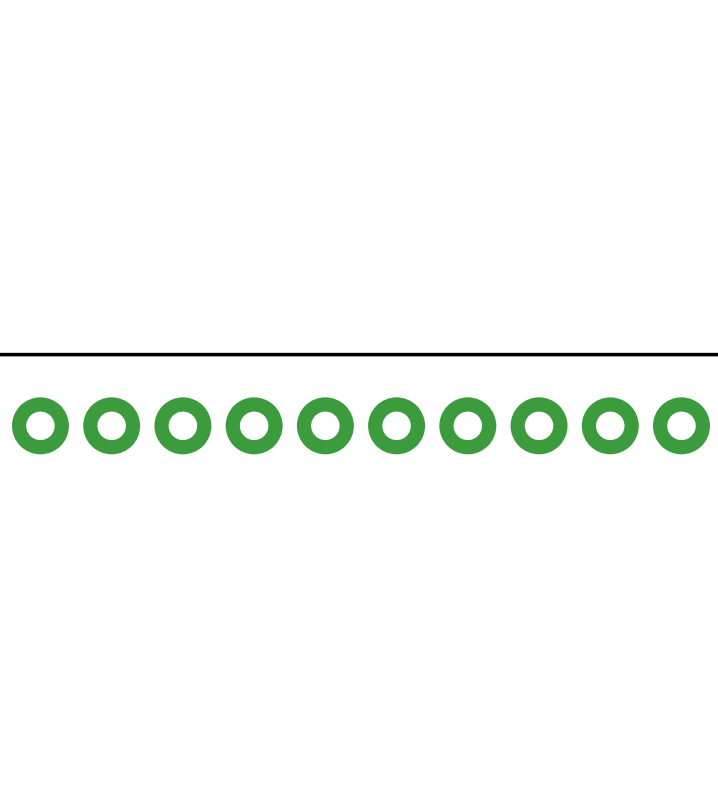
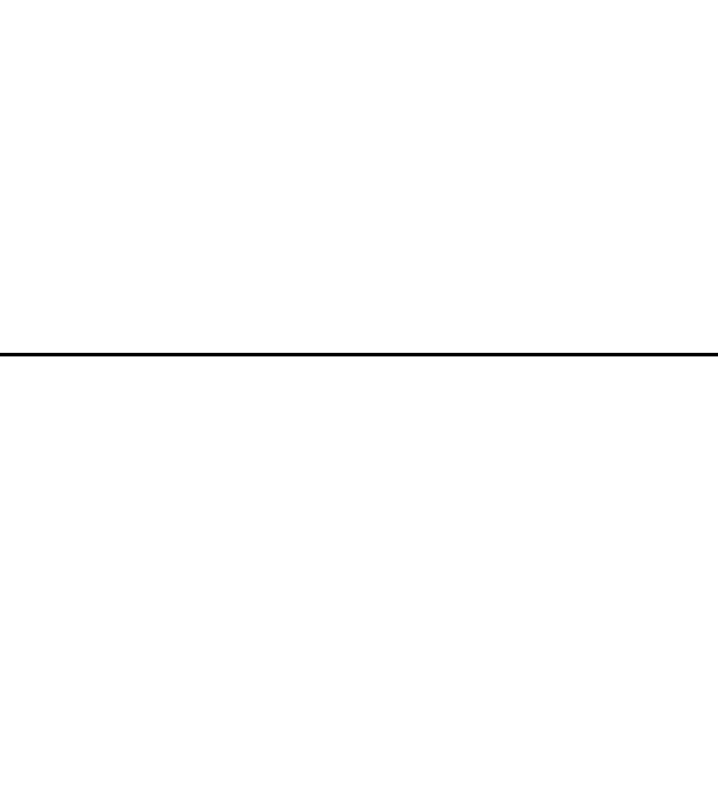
via: (40, 425) -> none
via: (111, 425) -> none
via: (182, 425) -> none
via: (254, 425) -> none
via: (325, 425) -> none
via: (396, 425) -> none
via: (467, 425) -> none
via: (539, 425) -> none
via: (610, 425) -> none
via: (681, 425) -> none

